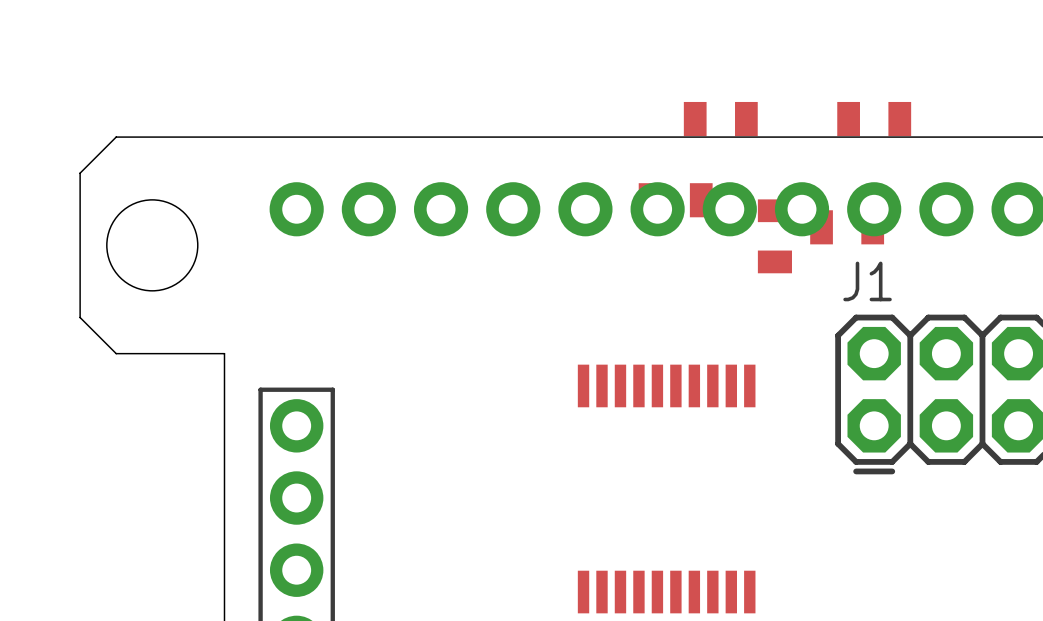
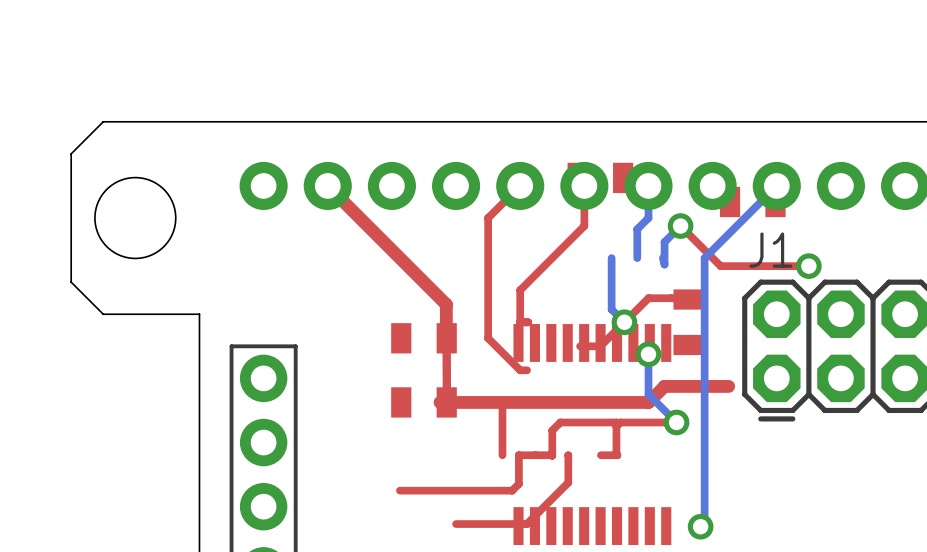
part: (720, 119) -> none
part: (874, 119) -> none
top track: none -> (327, 185) (446, 304) (446, 402) (446, 338)
top track: none -> (520, 185) (488, 218) (488, 338) (520, 370) (527, 370)
top track: none -> (584, 185) (584, 226) (520, 290) (520, 322)
bottom track: none -> (648, 185) (648, 218) (637, 229) (637, 258)
bottom track: none -> (776, 185) (704, 258) (704, 522) (700, 526)
part: (774, 236) -> none
top track: none -> (680, 226) (720, 266) (808, 266)
bottom track: none -> (680, 226) (664, 242) (664, 264) (662, 258)
via: none -> (680, 226)
bottom track: none -> (611, 258) (611, 309) (624, 322)
via: none -> (808, 266)
top track: none -> (688, 299) (648, 298) (600, 346) (580, 346)
top track: none -> (520, 322) (528, 322) (520, 322)
via: none -> (624, 322)
part: none -> (688, 322)
part: none -> (423, 338)
bottom track: none -> (648, 354) (648, 394) (676, 422)
via: none -> (648, 354)
top track: none -> (728, 386) (664, 386) (648, 402) (440, 402) (446, 401)
part: none -> (423, 402)
top track: none -> (504, 402) (502, 404) (502, 455)
top track: none -> (676, 422) (620, 422) (616, 426)
via: none -> (676, 422)
top track: none -> (568, 455) (568, 482) (526, 524) (456, 524)
top track: none -> (600, 455) (617, 455) (616, 422) (560, 422) (552, 430) (552, 455) (518, 455) (518, 483) (512, 490) (399, 490)
via: none -> (700, 526)

